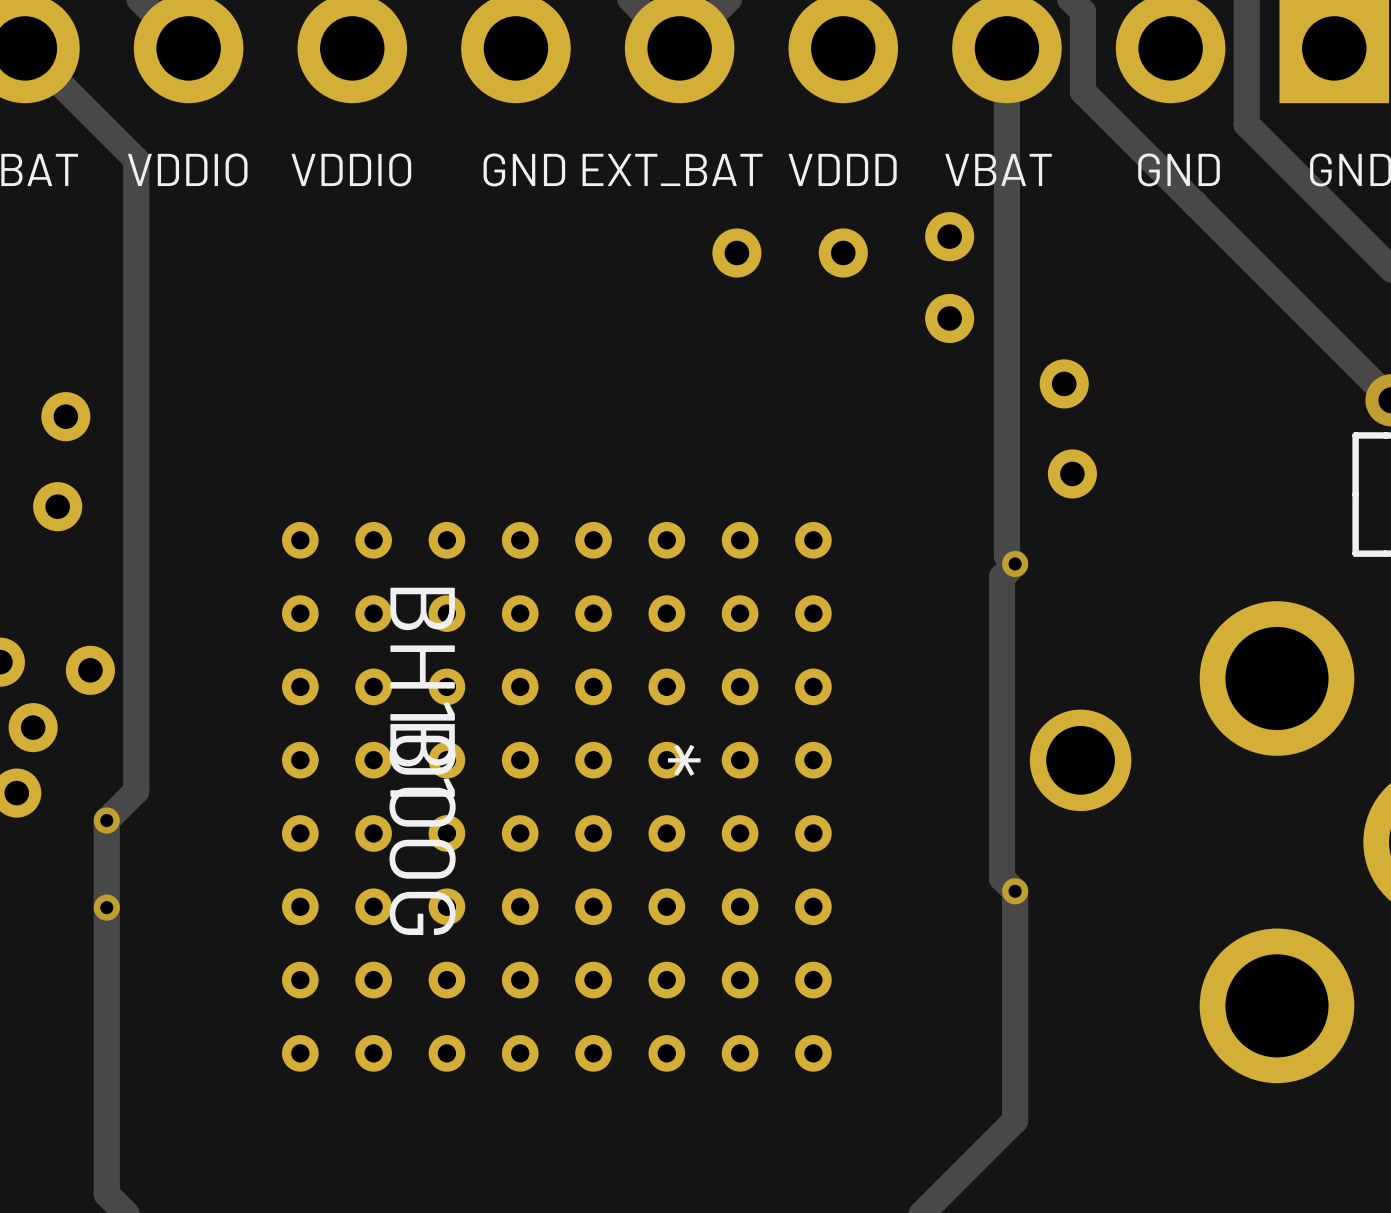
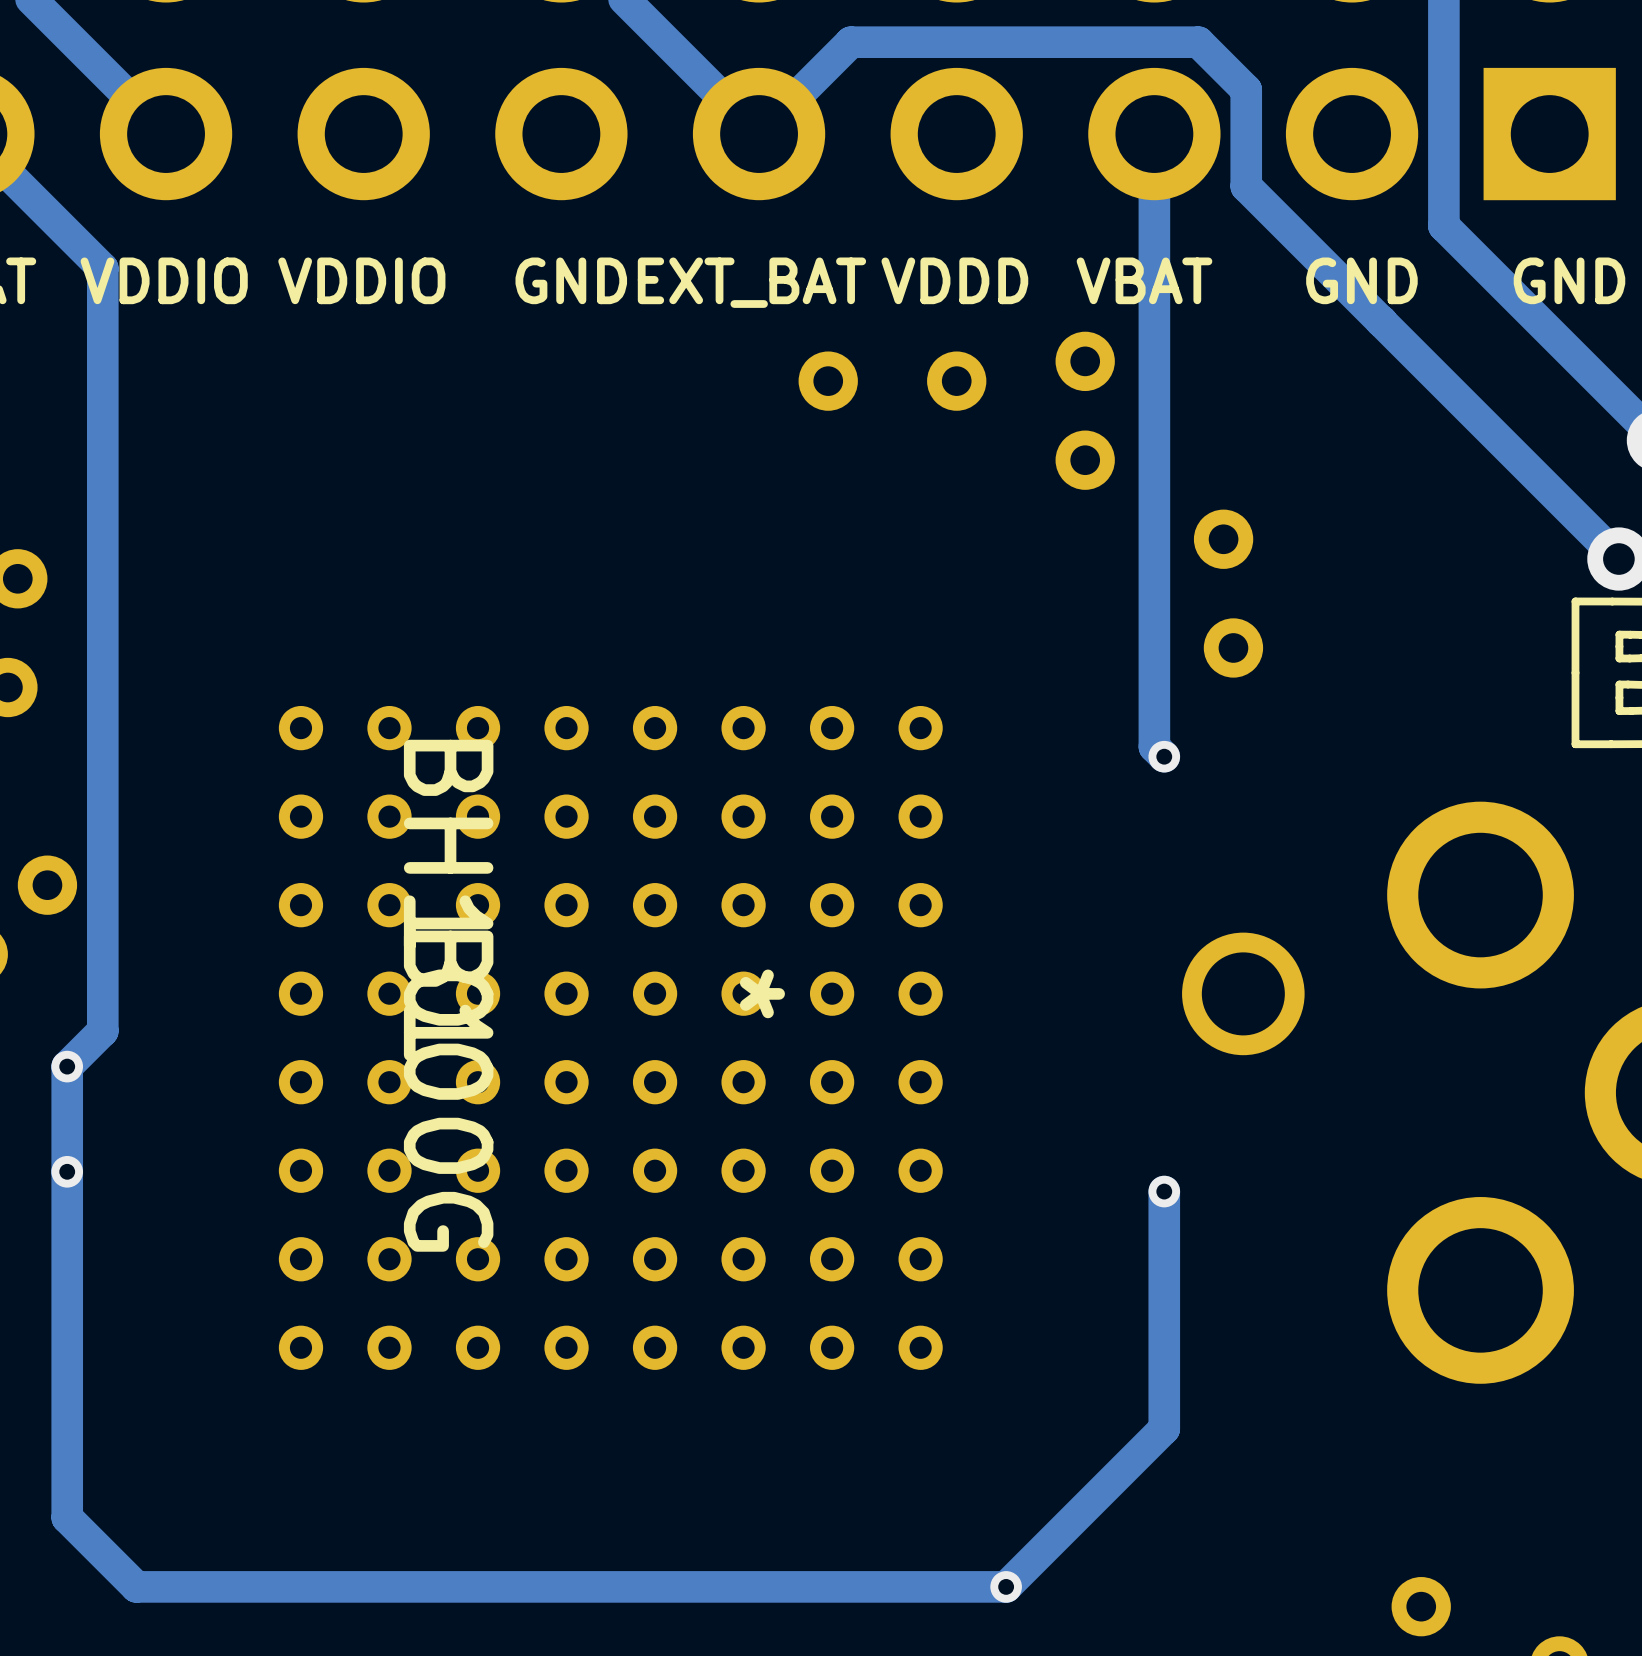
track: (1015, 563) (1002, 577) (1002, 878) (1015, 891) (1015, 924) -> none
via position: (1015, 891) -> (1164, 1191)

